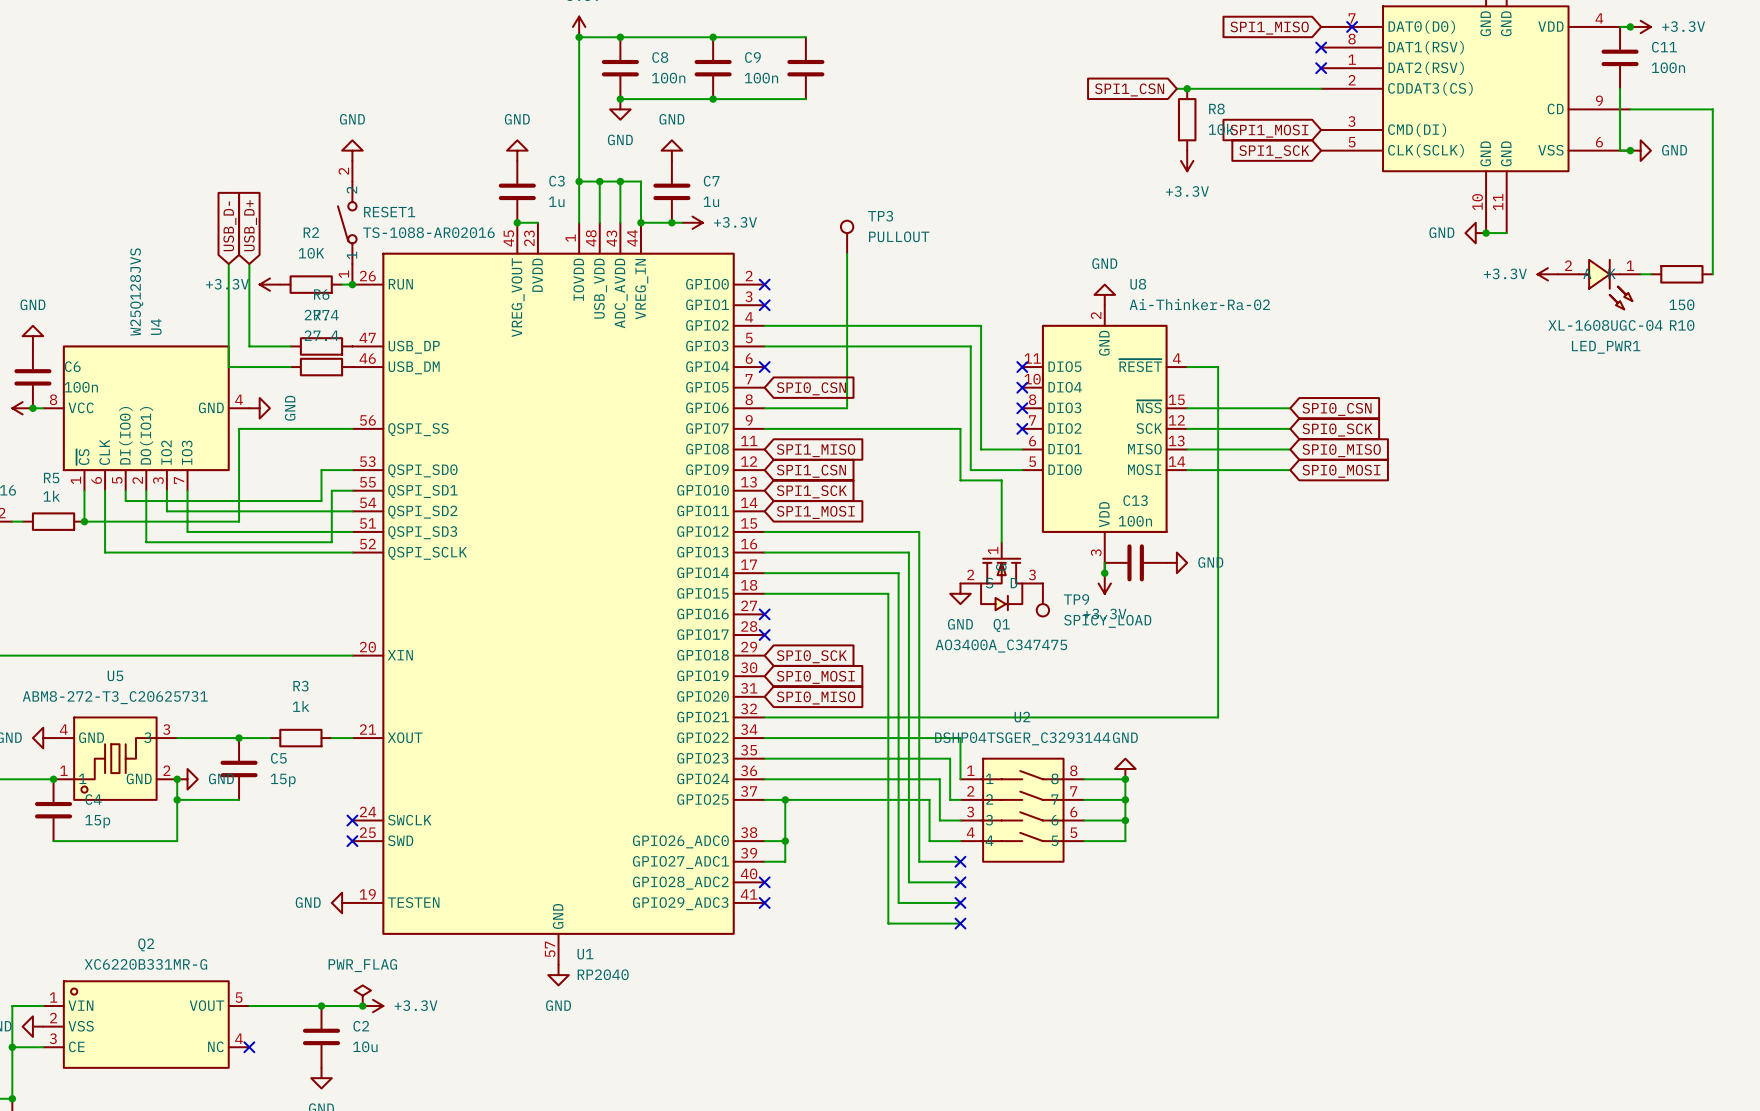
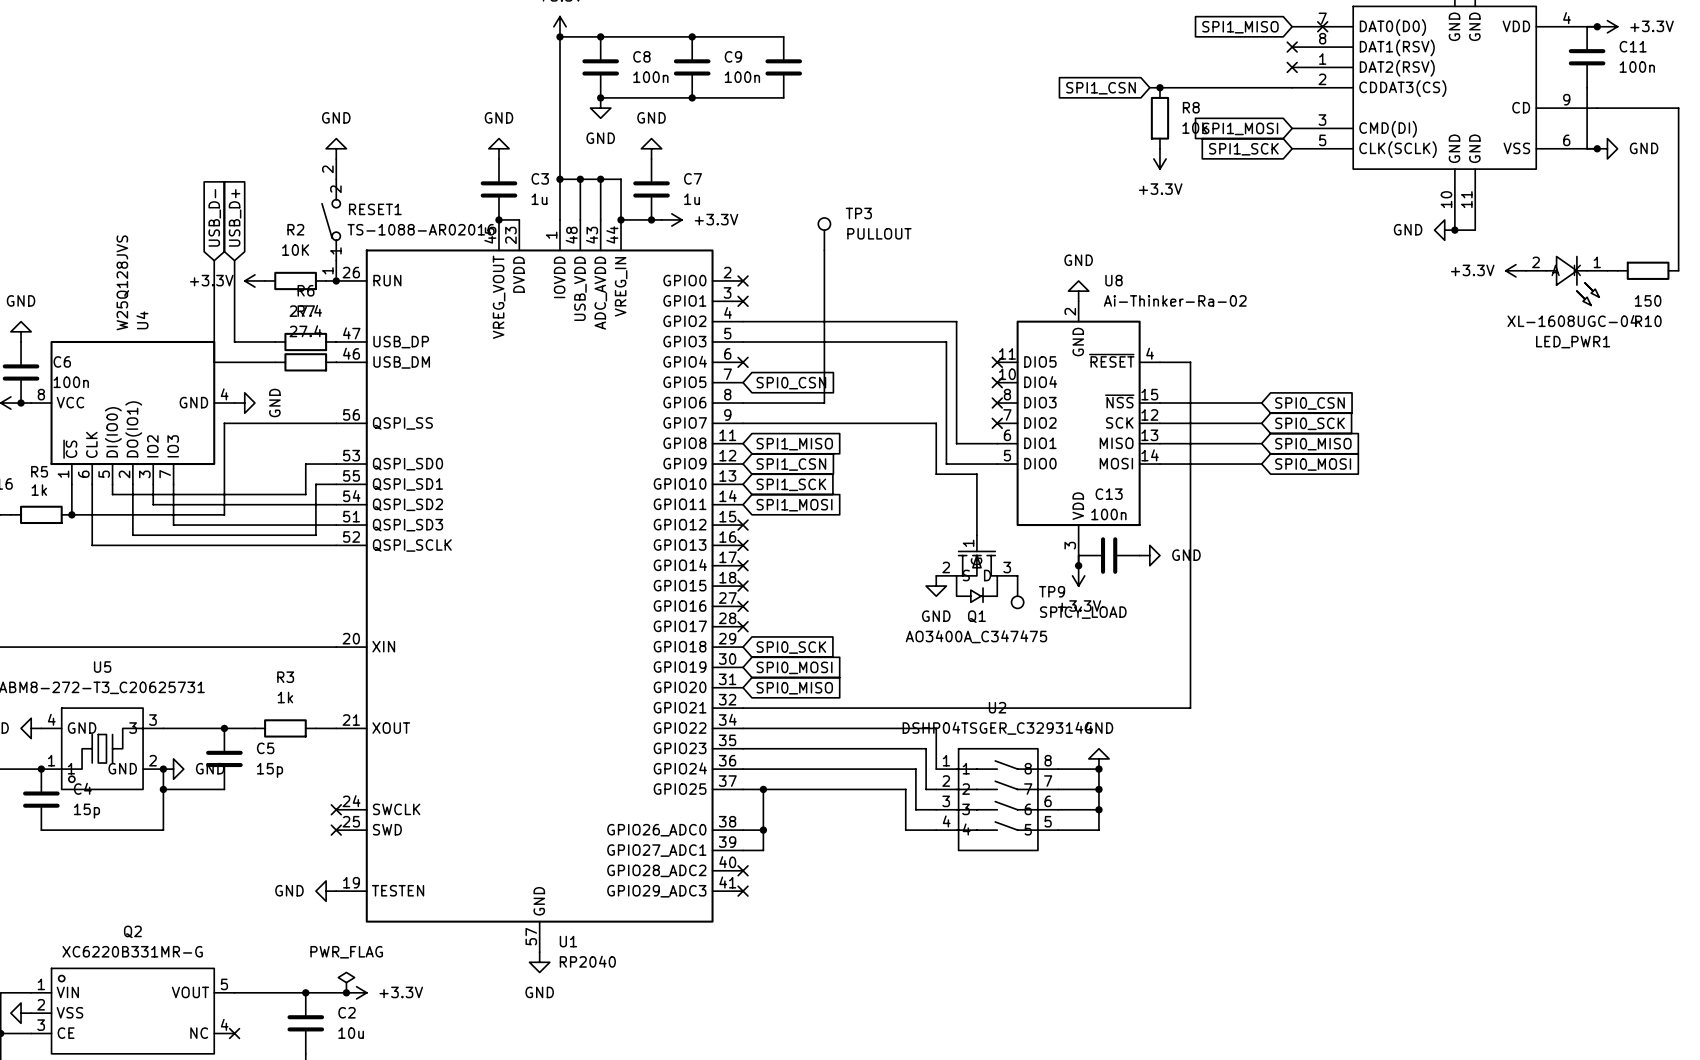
wire: (764, 531) (919, 531) (919, 861) (960, 861) -> none
no-connect mark: none -> (743, 525)
wire: (764, 552) (908, 552) (908, 882) (960, 882) -> none
no-connect mark: none -> (743, 545)
wire: (764, 573) (898, 573) (898, 902) (960, 902) -> none
no-connect mark: none -> (743, 565)
wire: (764, 593) (888, 593) (888, 923) (960, 923) -> none
no-connect mark: none -> (743, 586)
no-connect mark: (960, 861) -> none
no-connect mark: (960, 882) -> none
no-connect mark: (960, 902) -> none
no-connect mark: (960, 923) -> none

